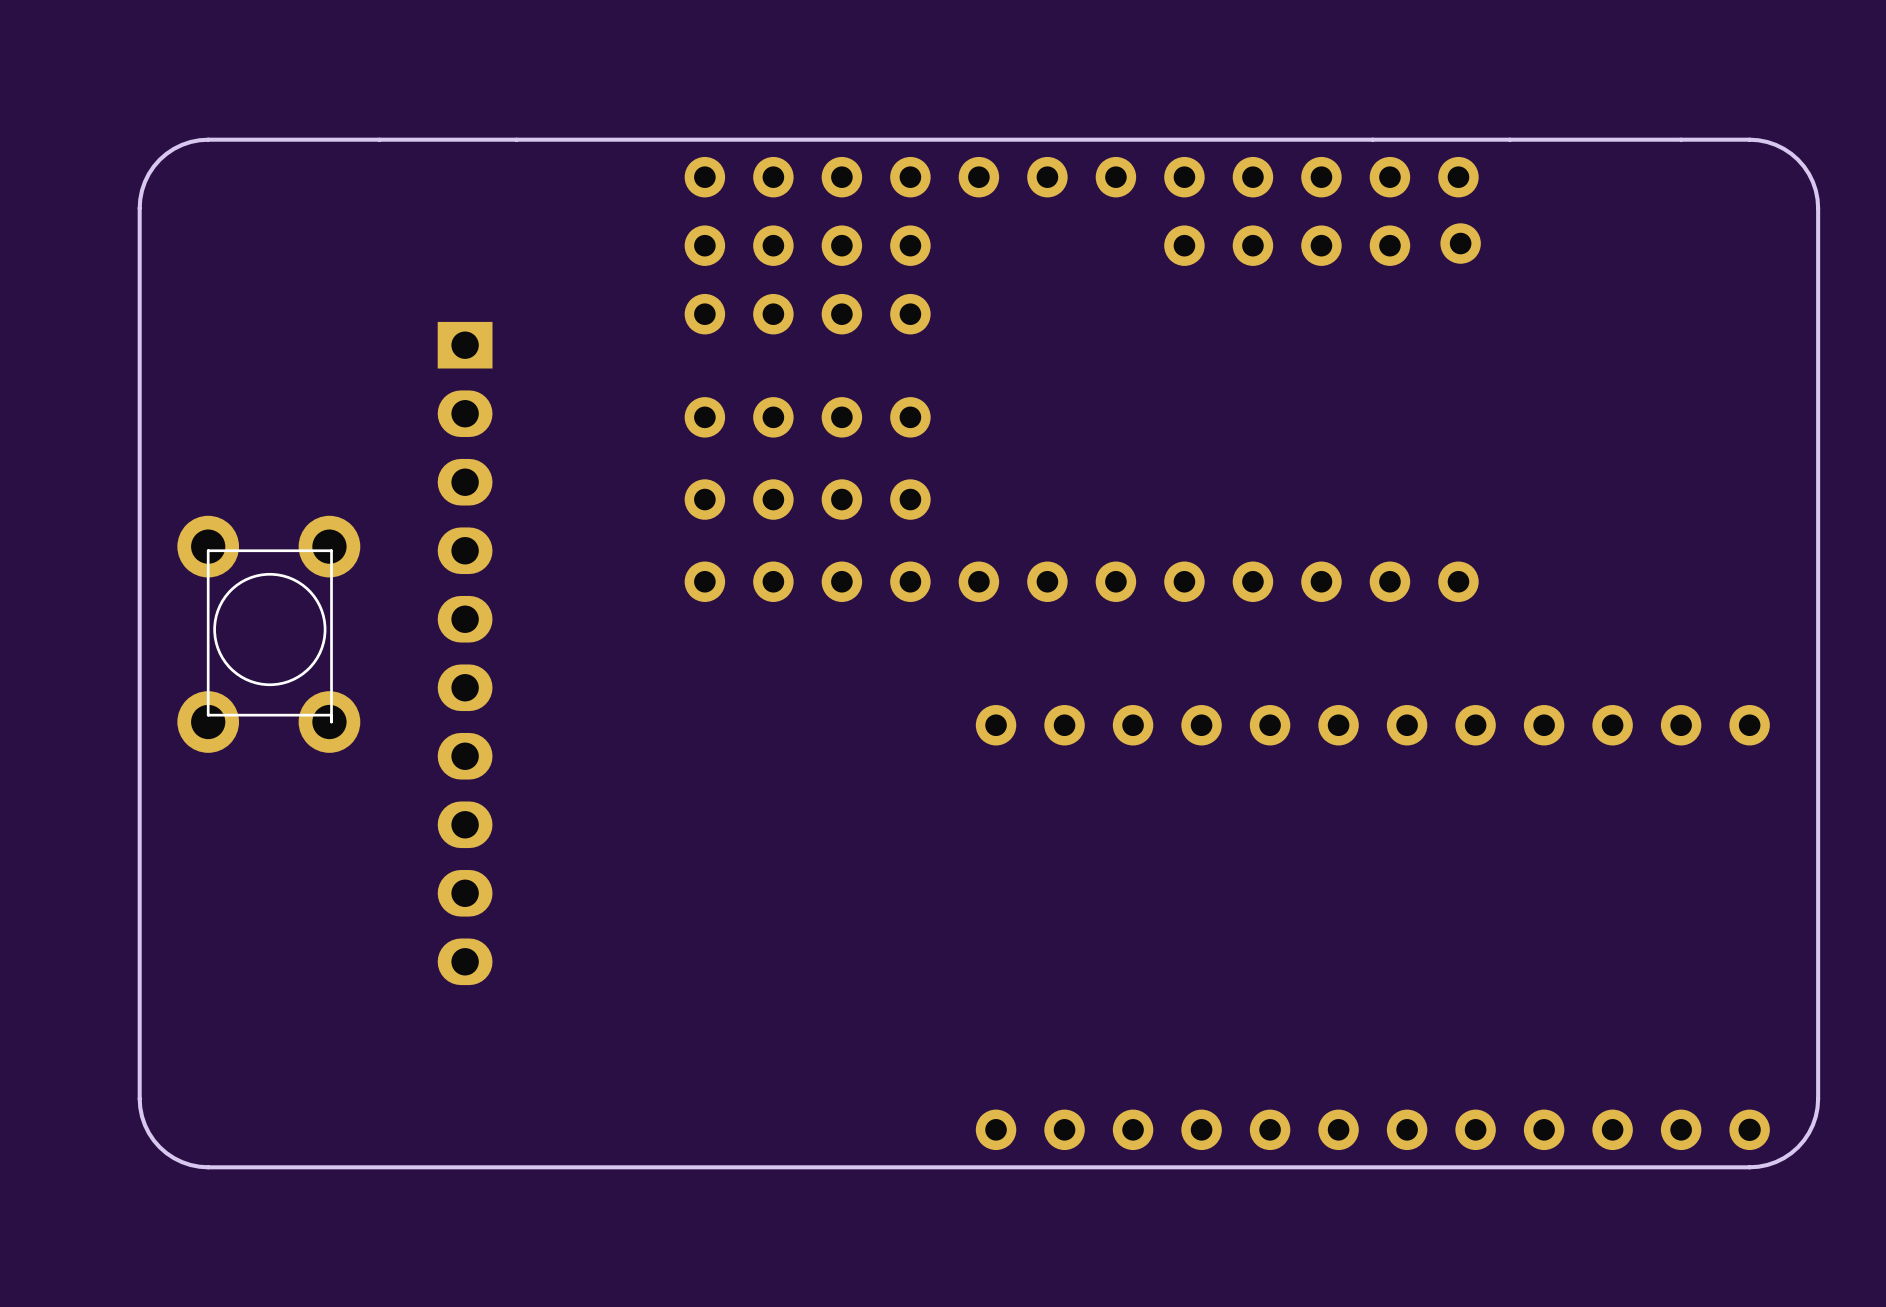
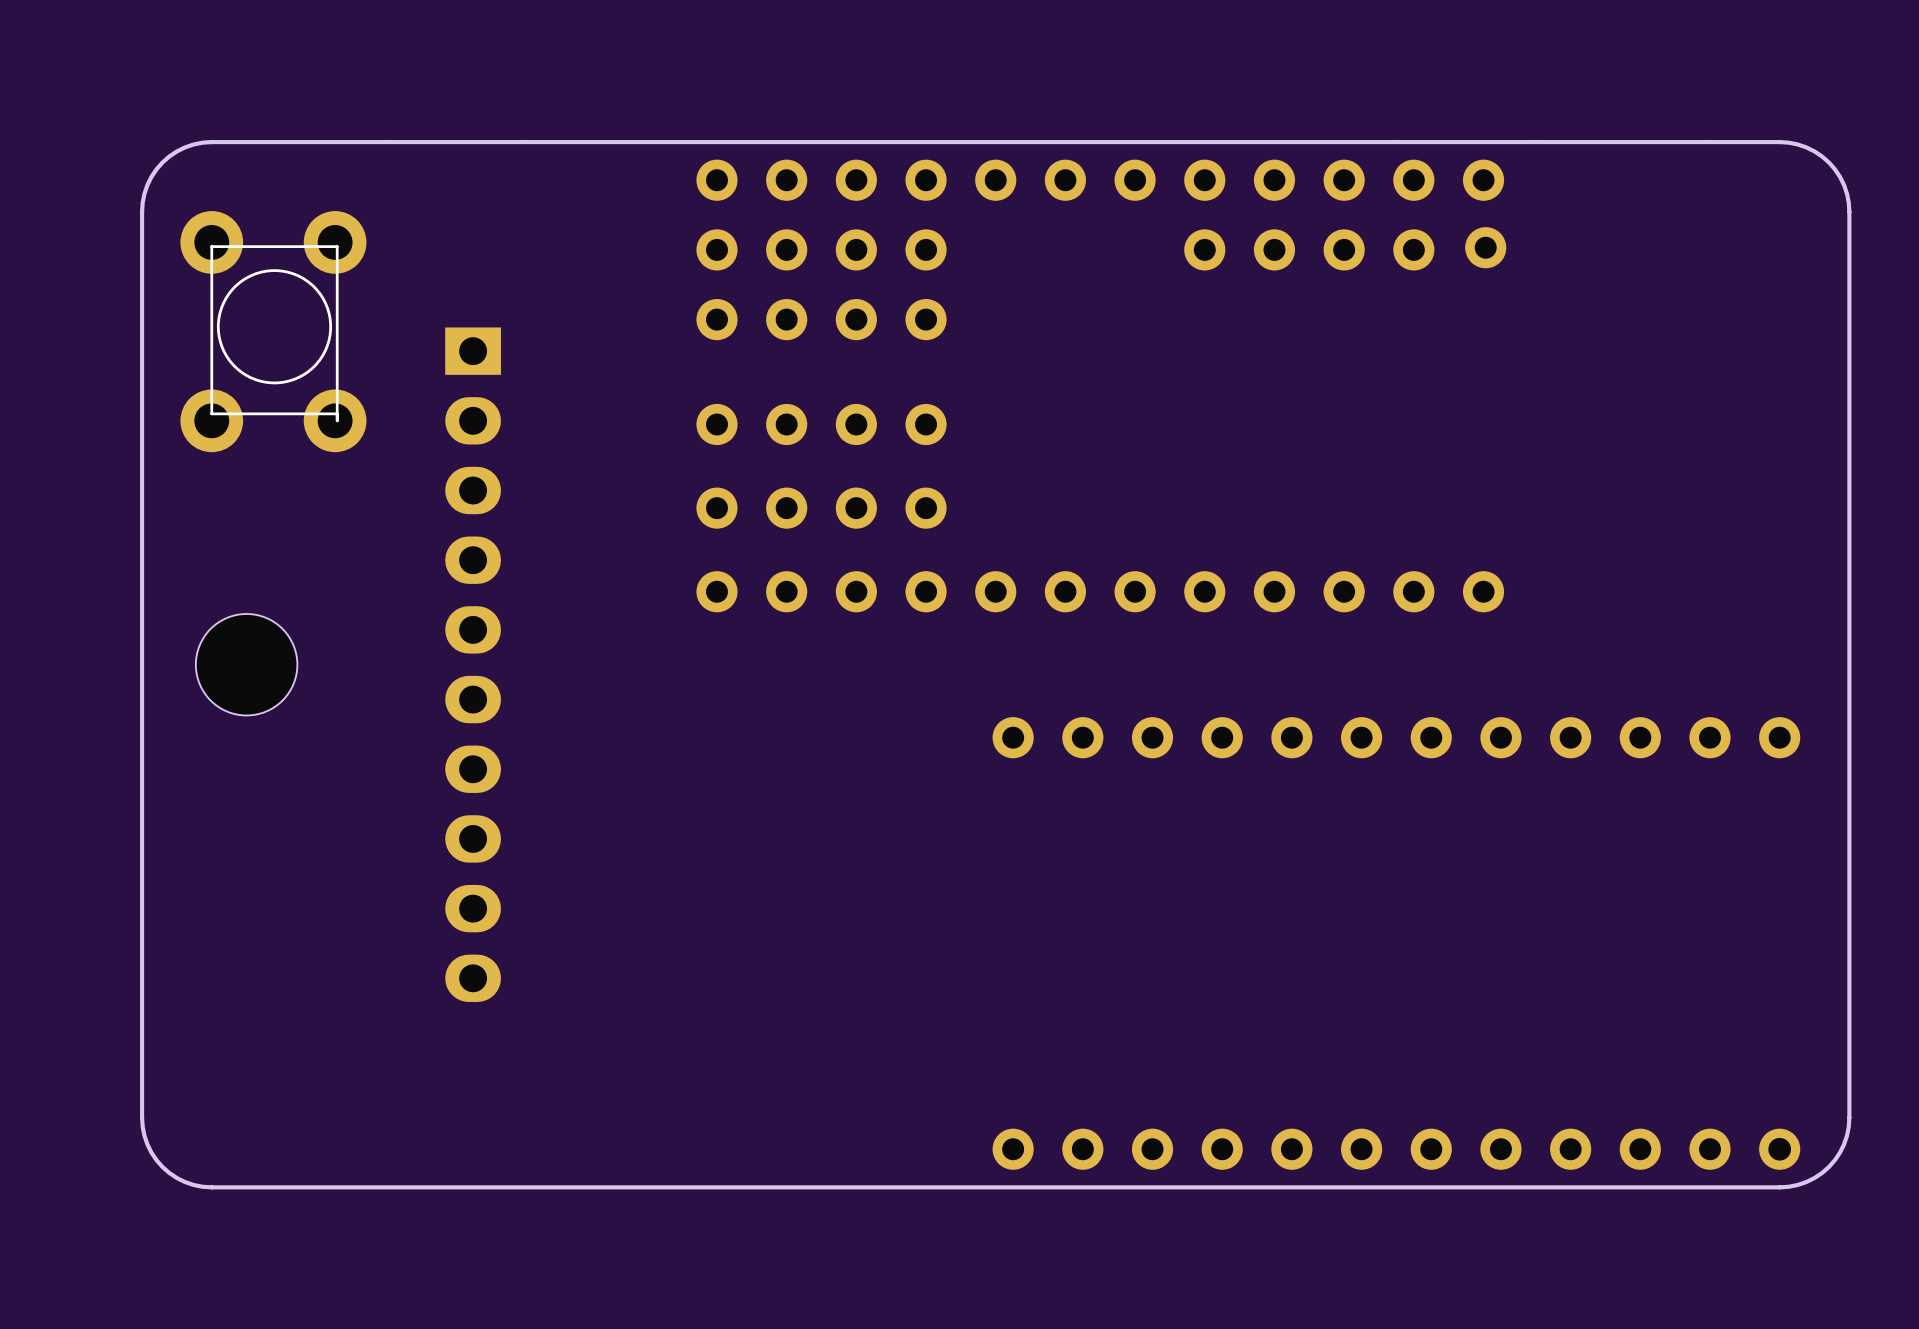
part position: (268, 634) -> (273, 331)
part: none -> (246, 664)

